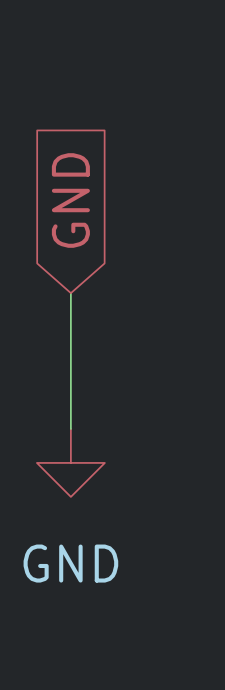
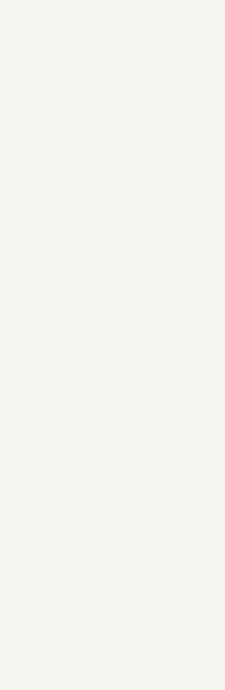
global label: GND (70, 200) -> none
wire: (70, 293) (70, 428) -> none
power symbol: GND (70, 462) -> none

